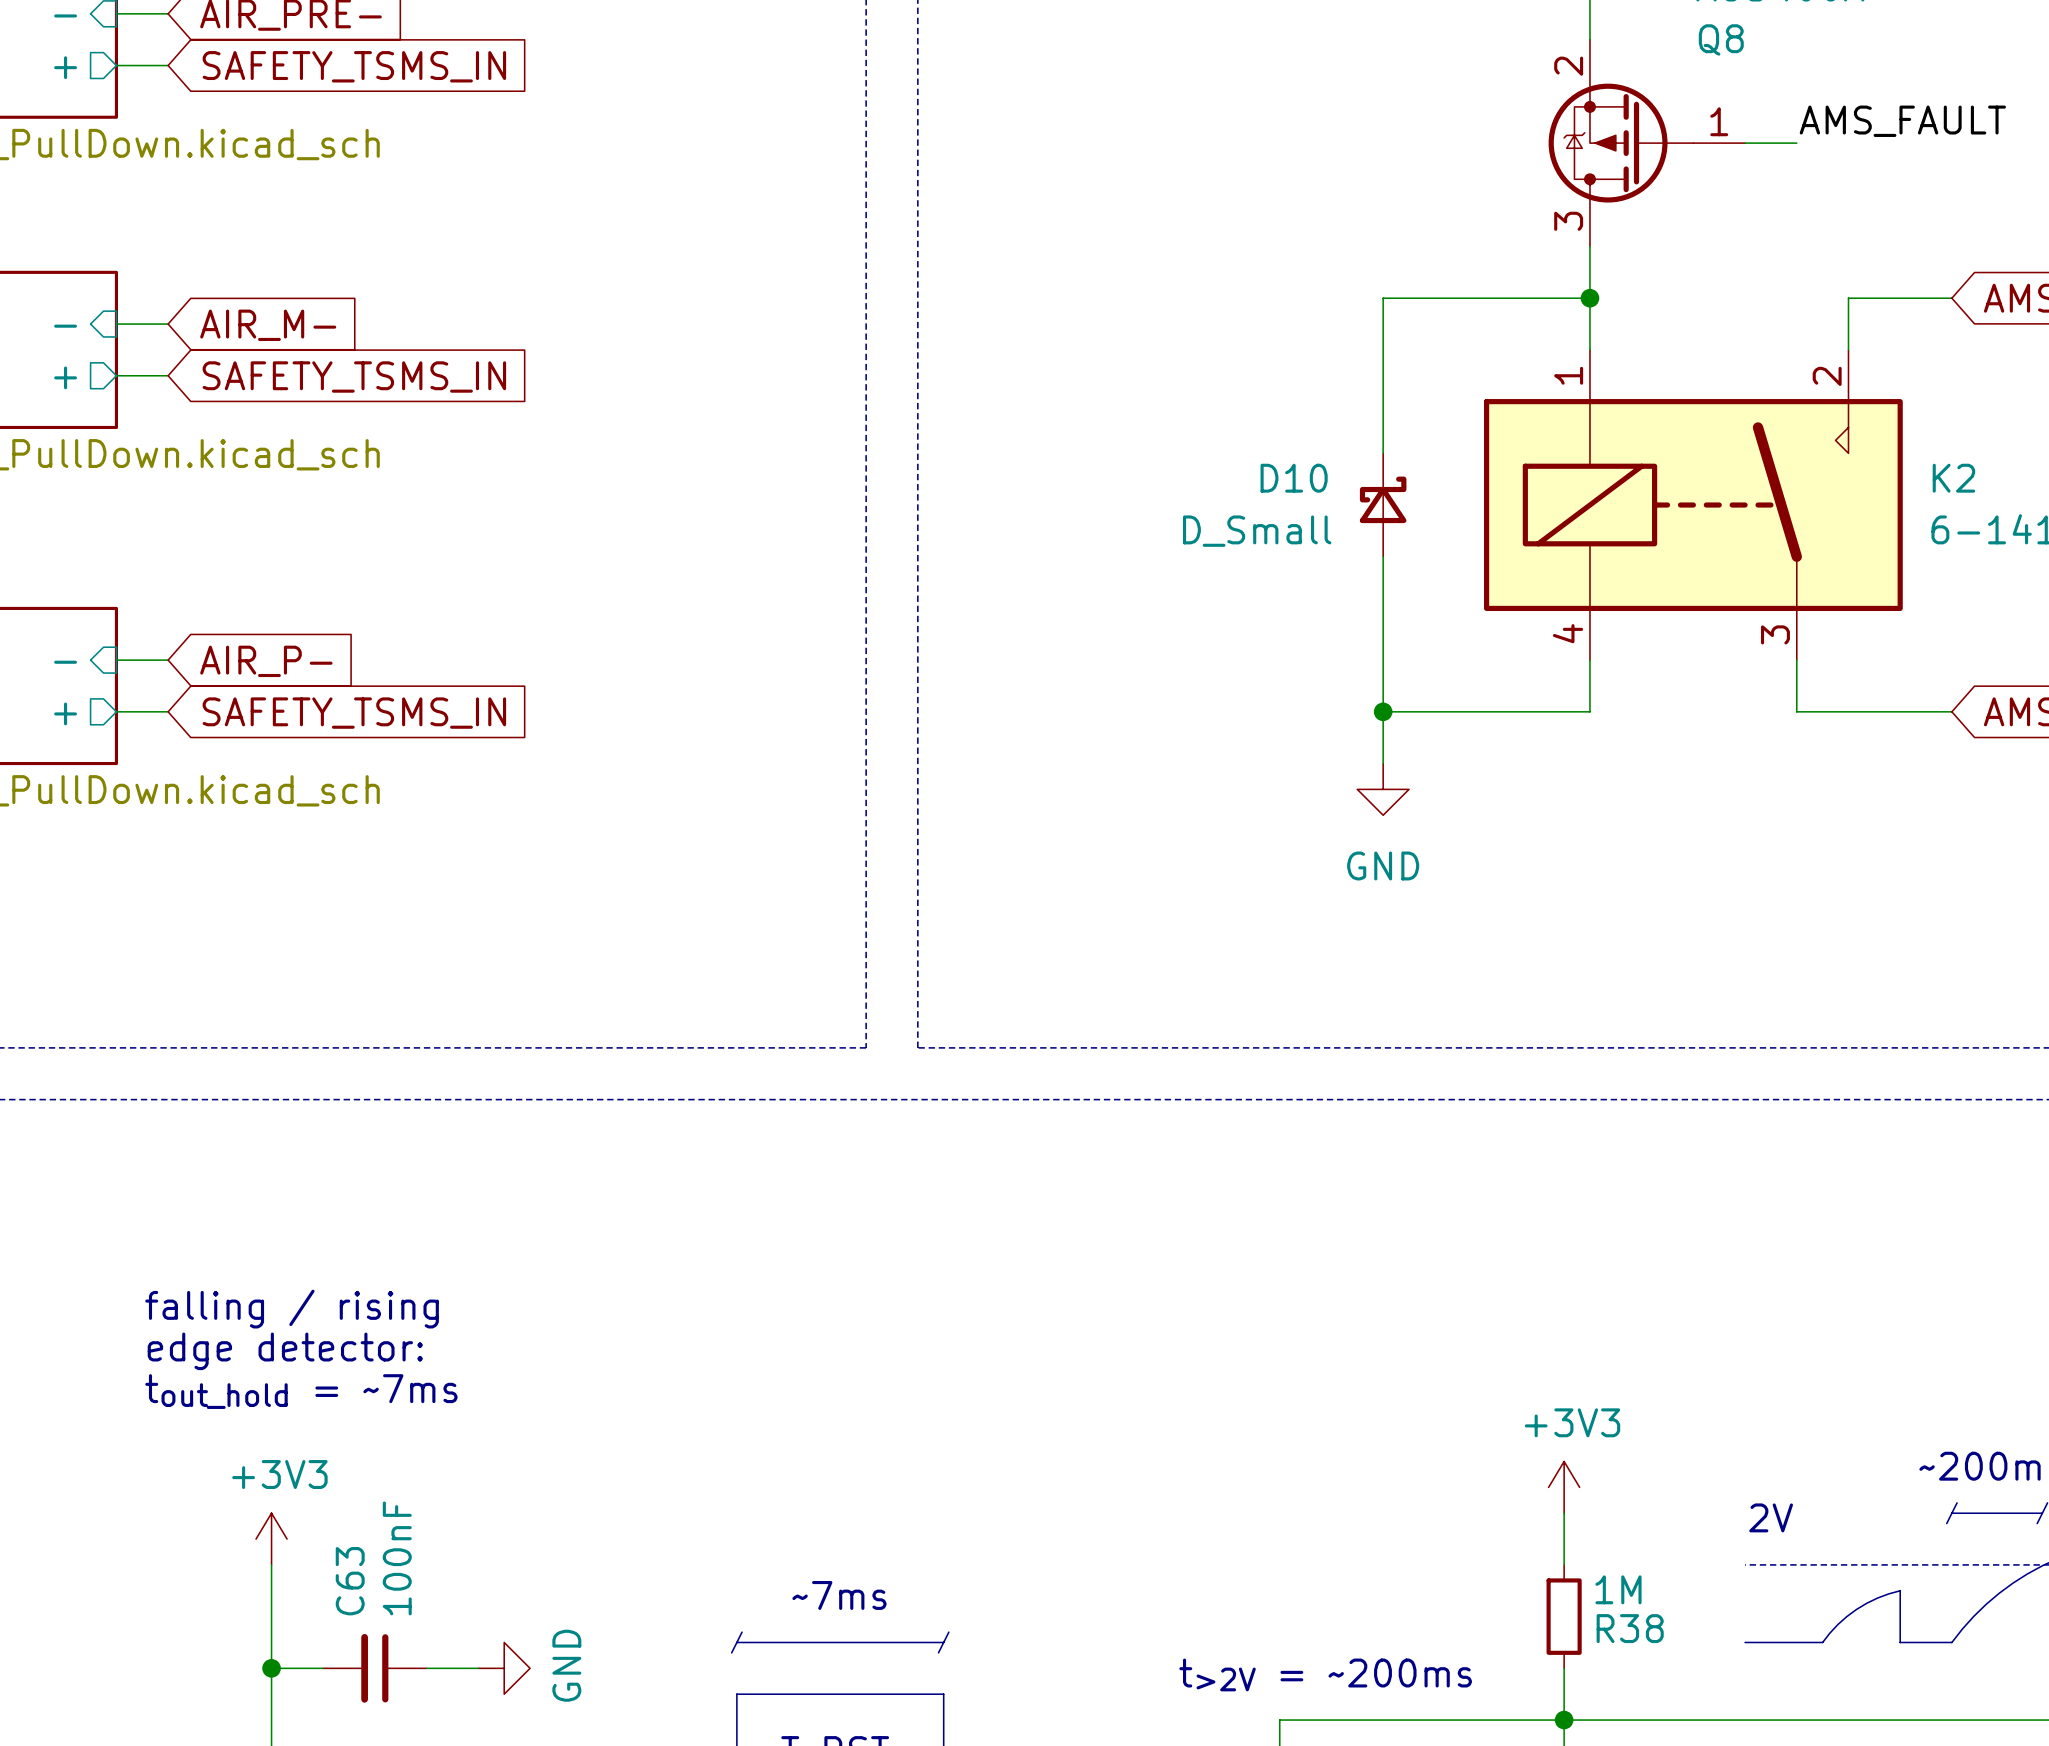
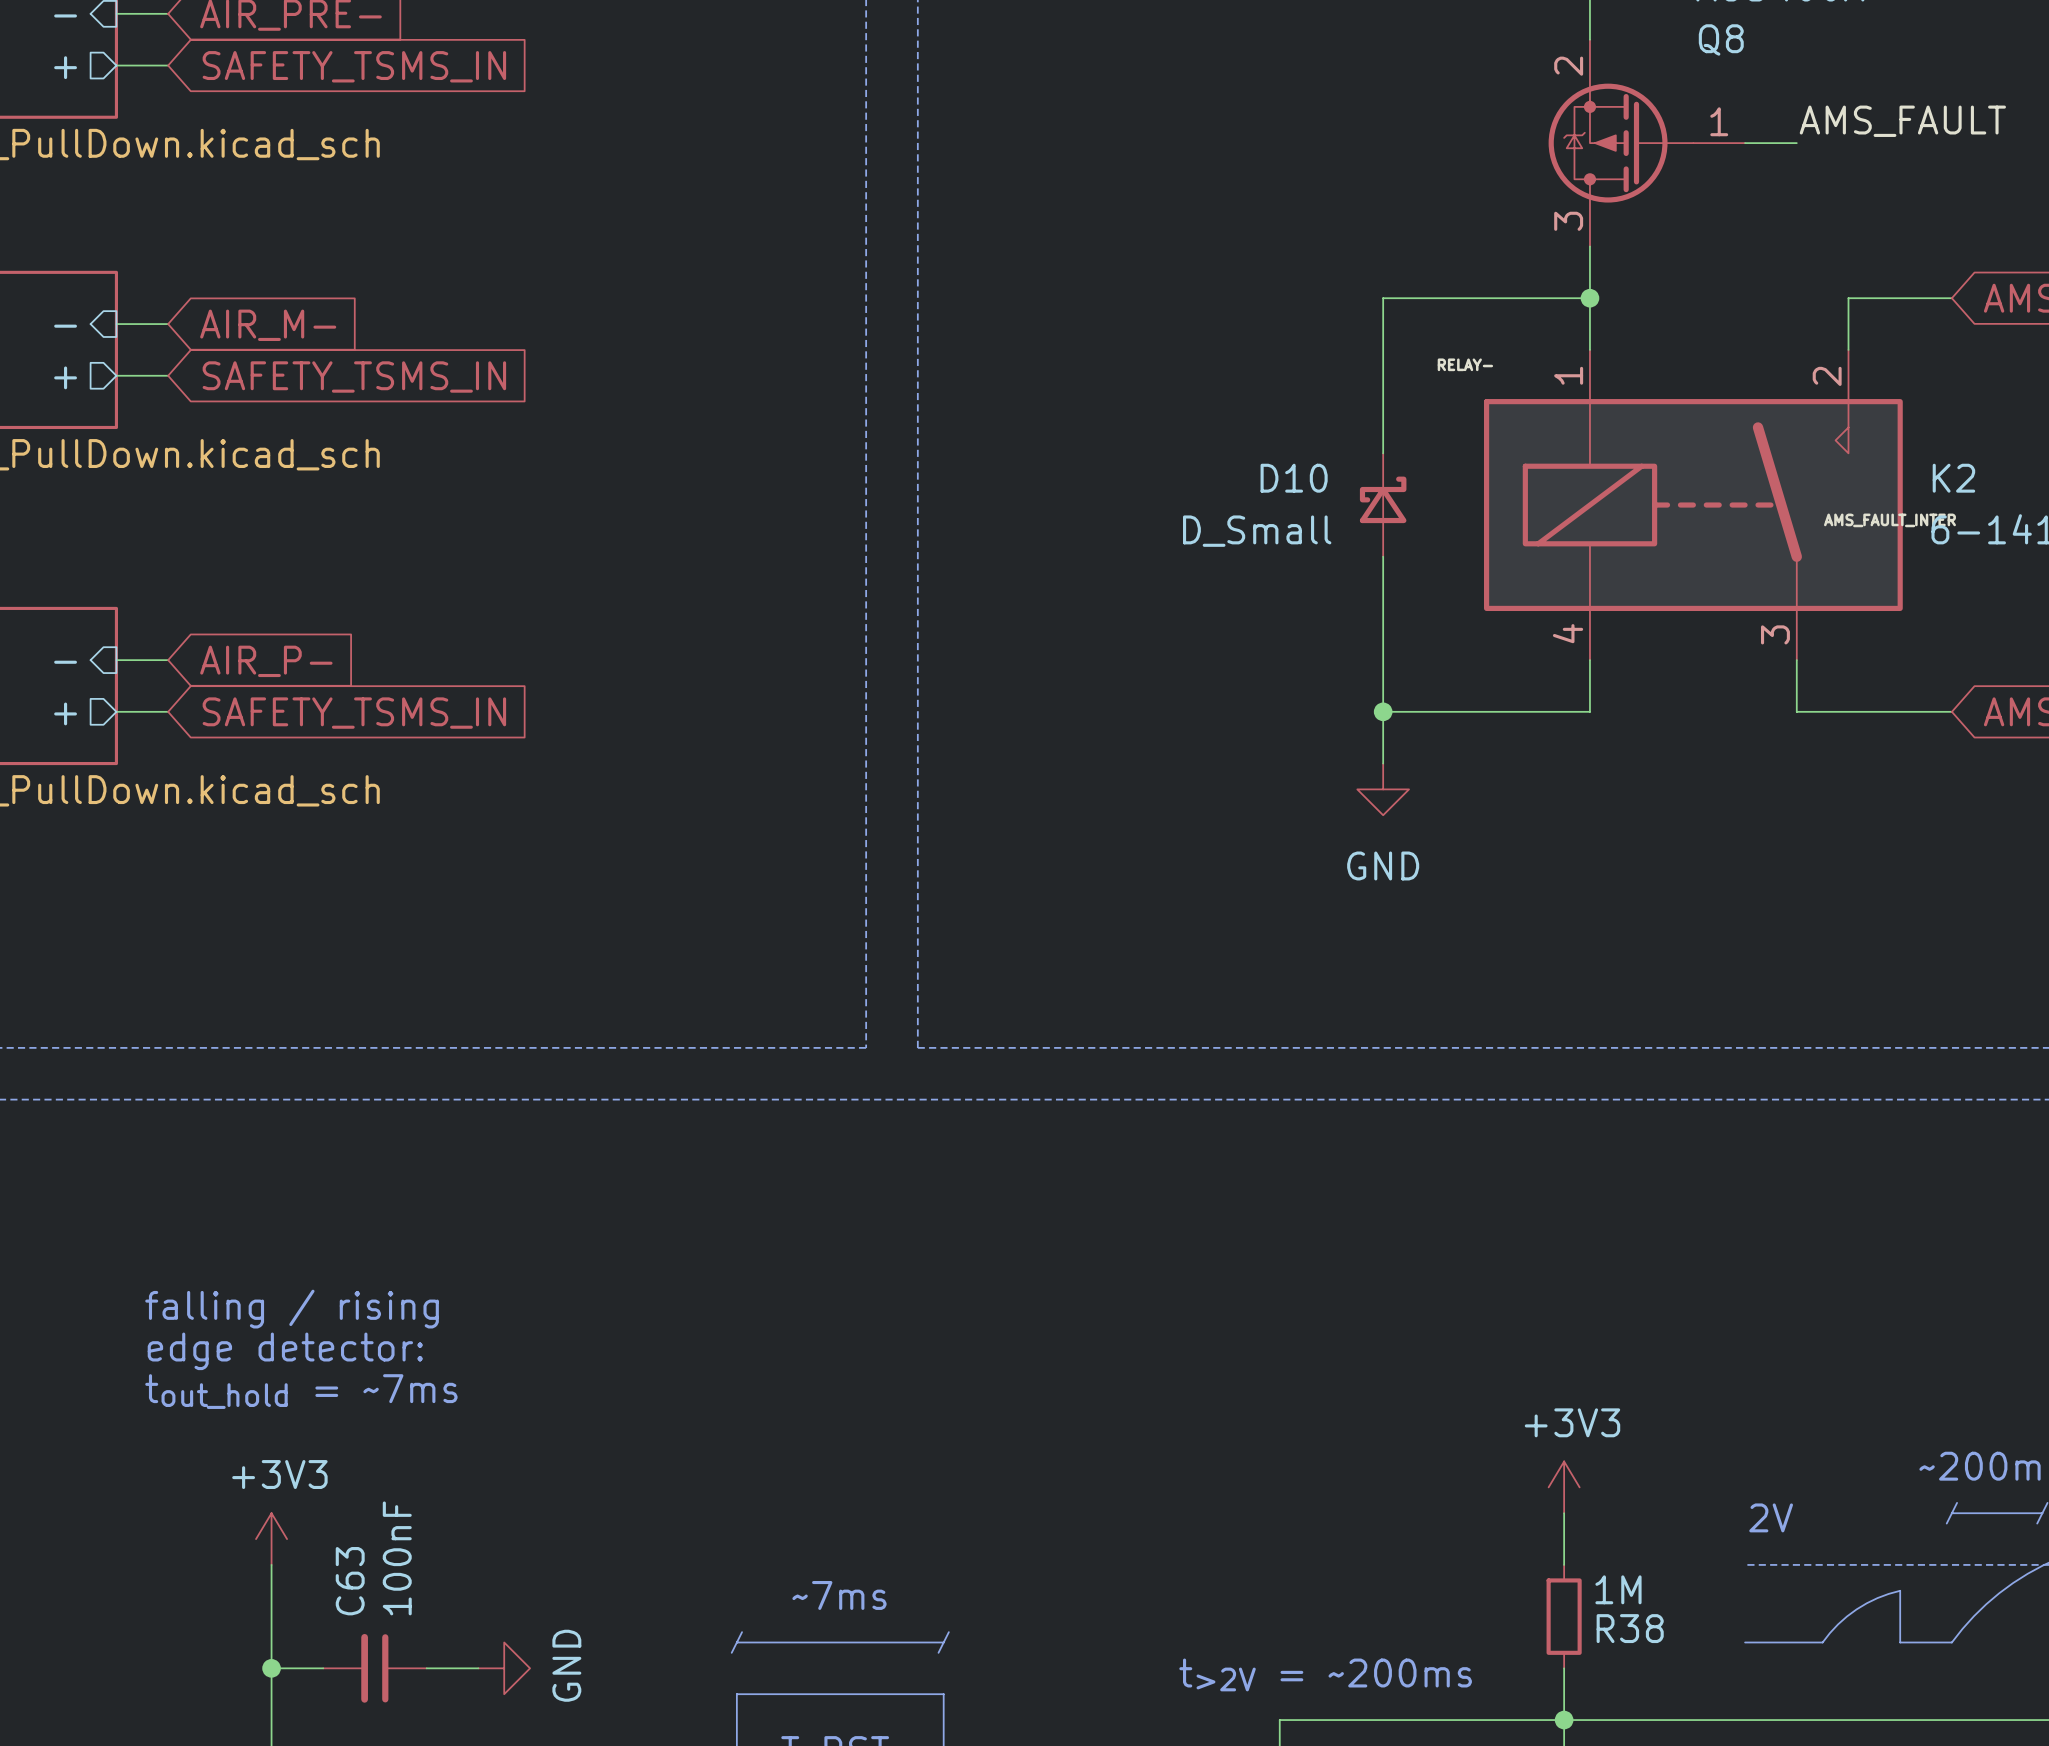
label: none -> RELAY- (1465, 364)
label: none -> AMS_FAULT_INTER (1889, 520)

